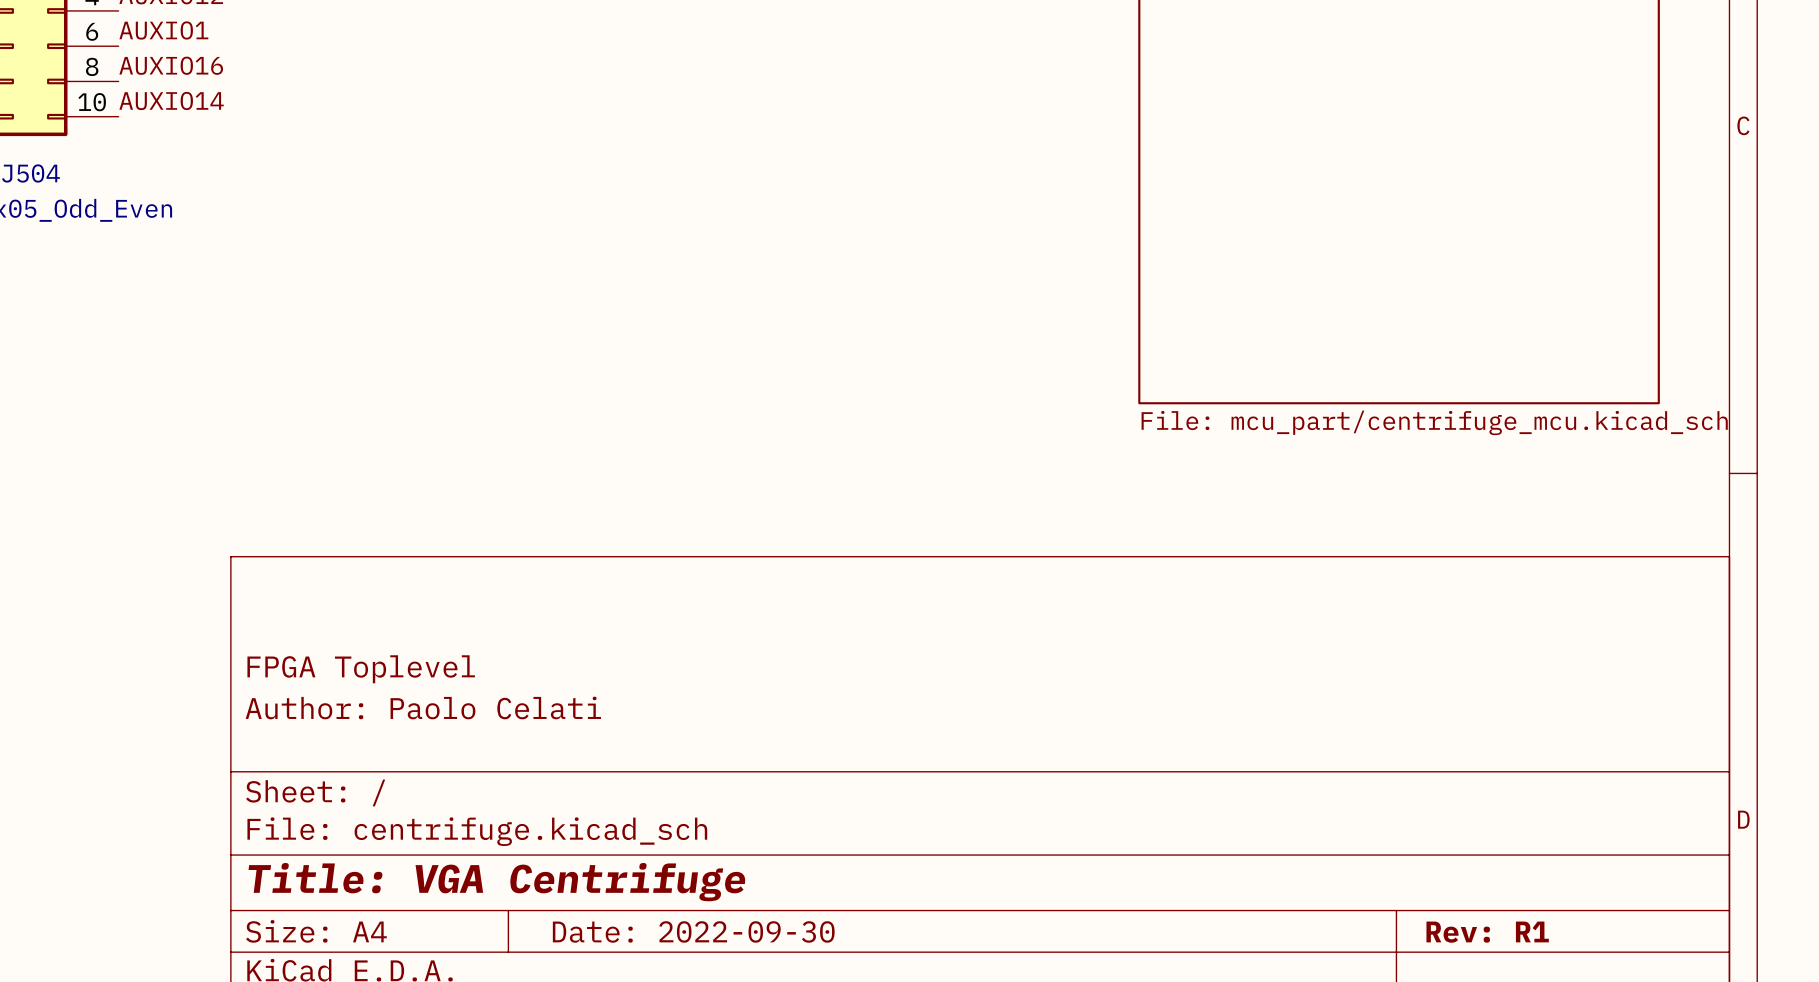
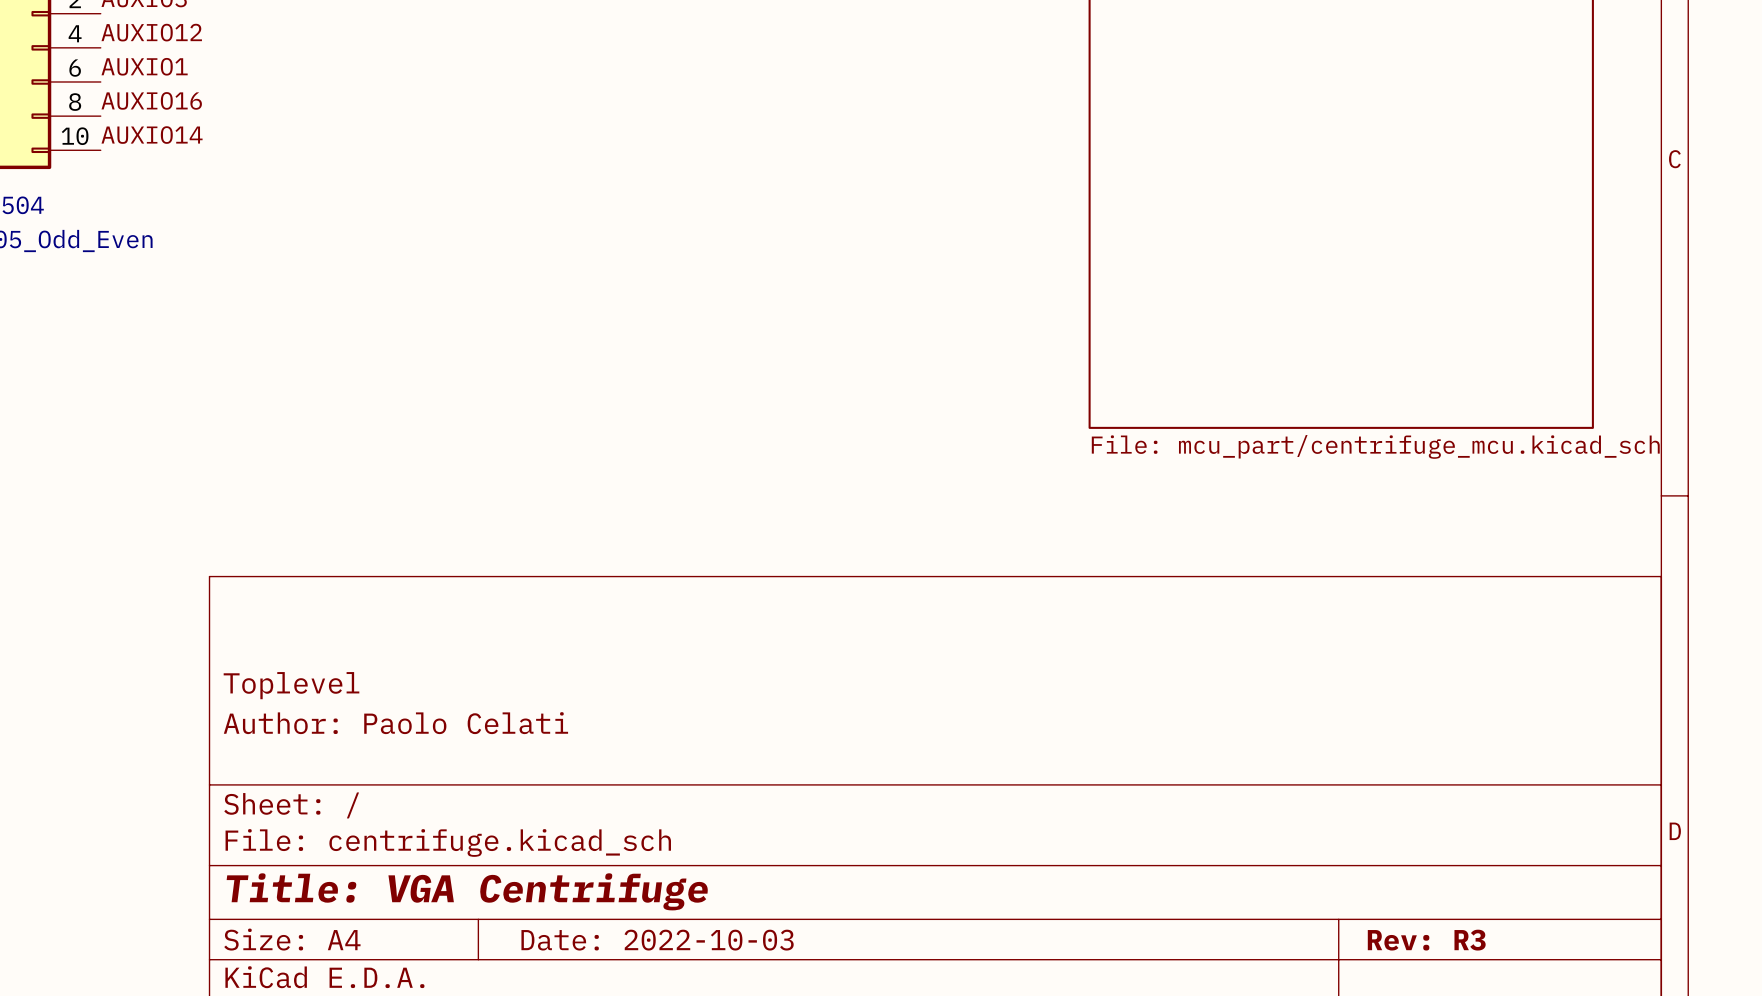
title block: FPGA Toplevel (361, 669) -> Toplevel (291, 685)
title block: Date: 2022-09-30 (693, 931) -> Date: 2022-10-03 (657, 940)
title block: Rev: R1 (1487, 932) -> Rev: R3 (1426, 940)

